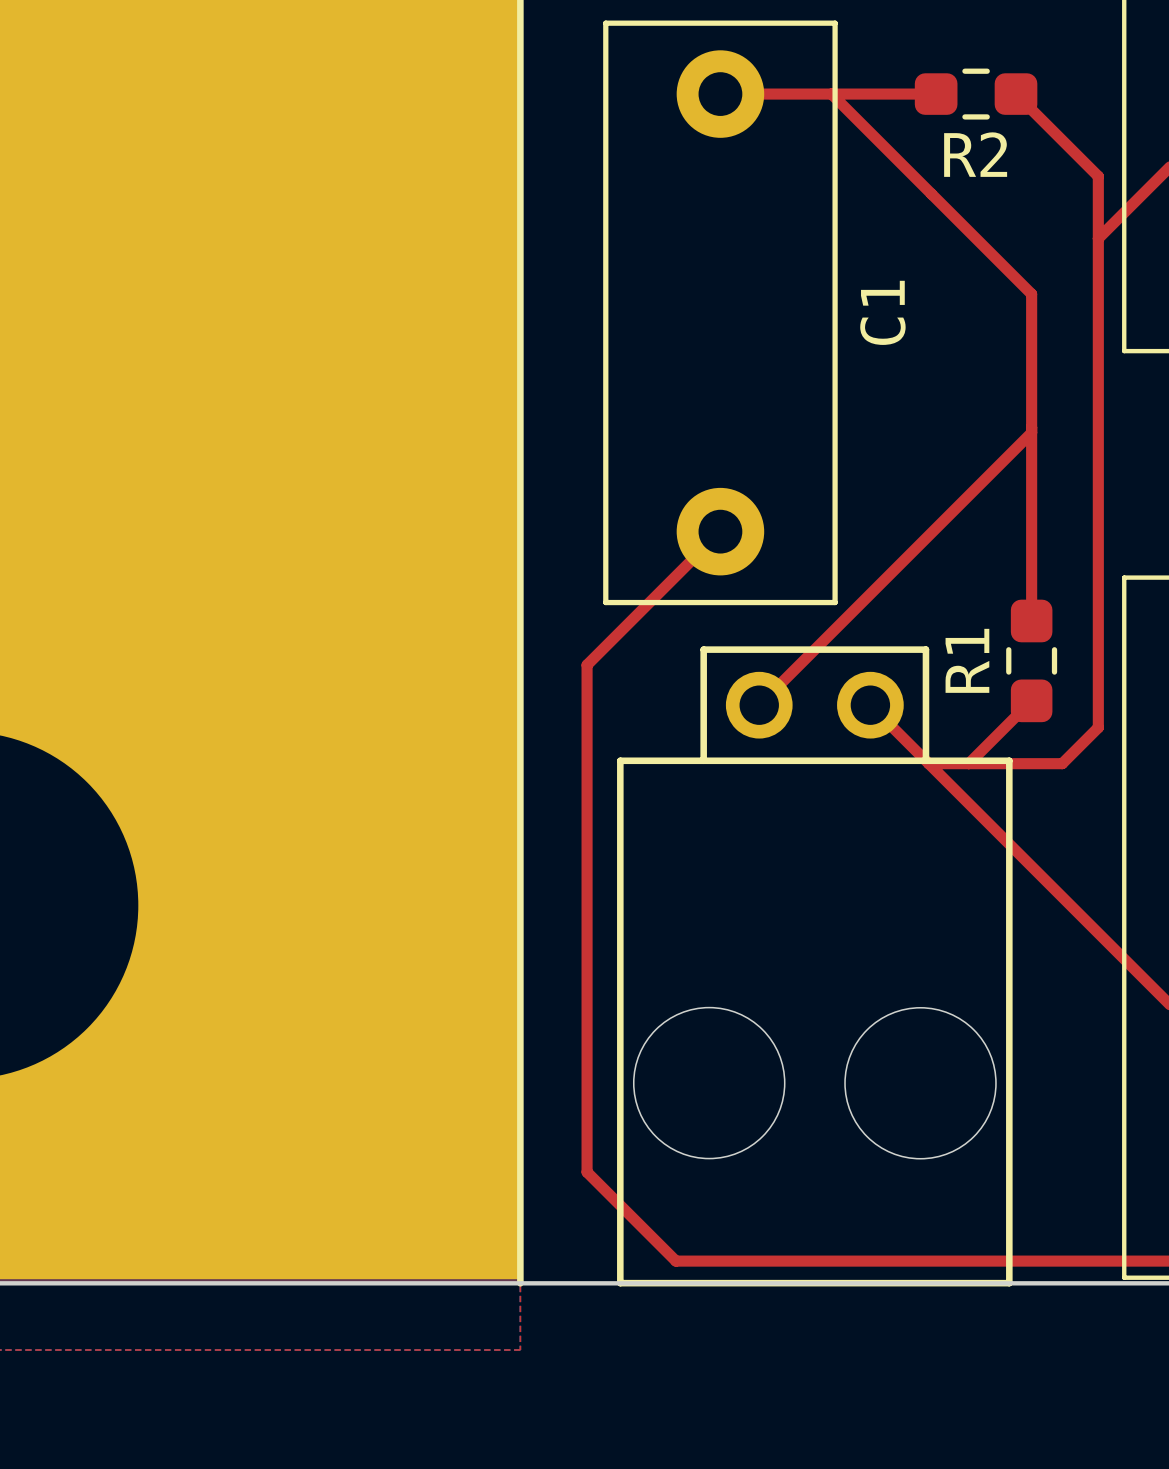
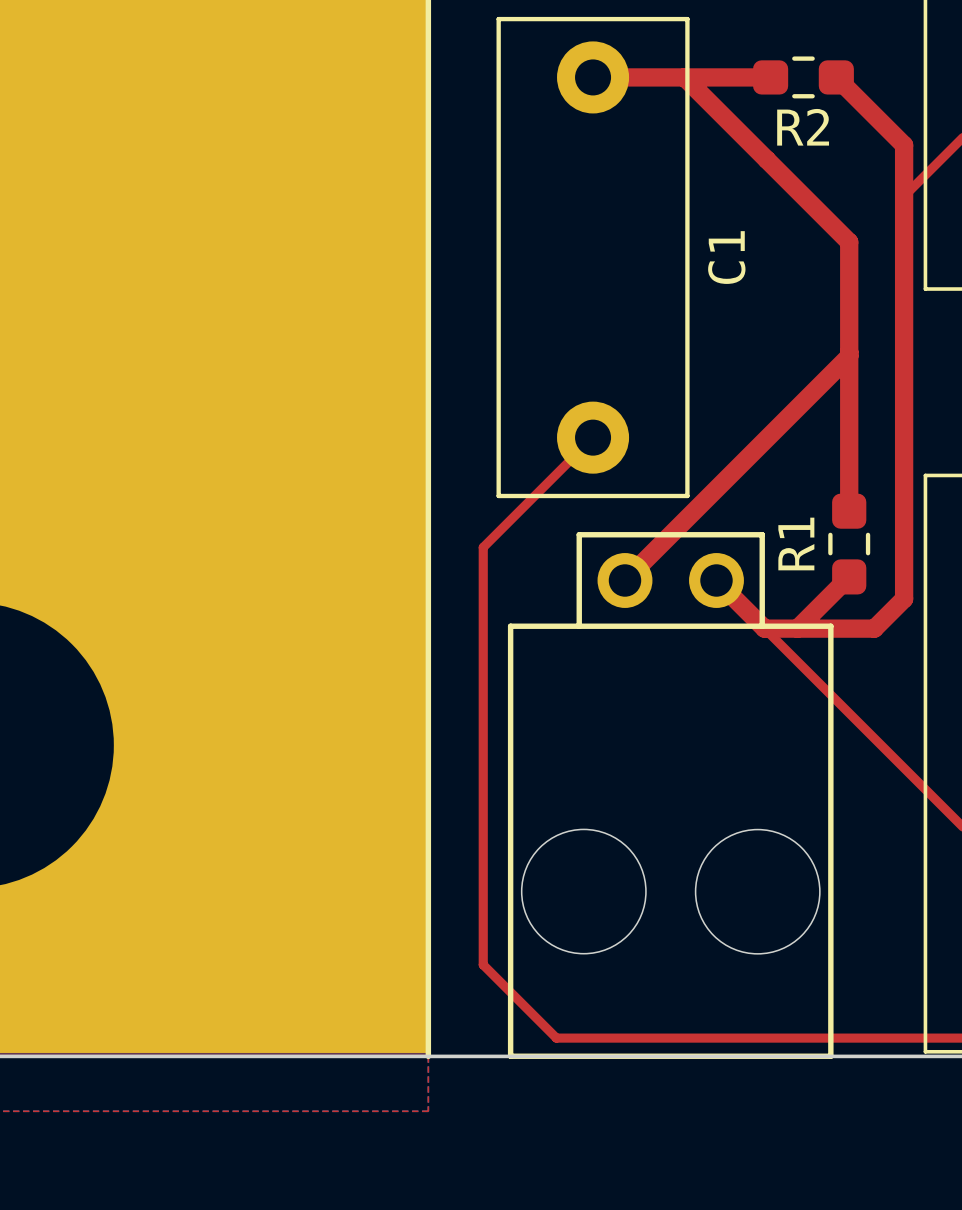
top track width: thin (720, 94) (936, 94) -> thick (593, 77) (770, 77)
top track width: thin (831, 94) (1031, 294) (1031, 620) -> thick (684, 77) (849, 242) (849, 511)
top track width: thin (1016, 94) (1098, 176) (1098, 727) (1062, 763) (928, 763) (870, 705) -> thick (836, 77) (904, 145) (904, 598) (874, 628) (764, 628) (716, 580)
top track width: thin (1031, 432) (759, 705) -> thick (849, 356) (624, 580)
top track width: thin (1031, 700) (968, 763) -> thick (849, 576) (797, 628)

